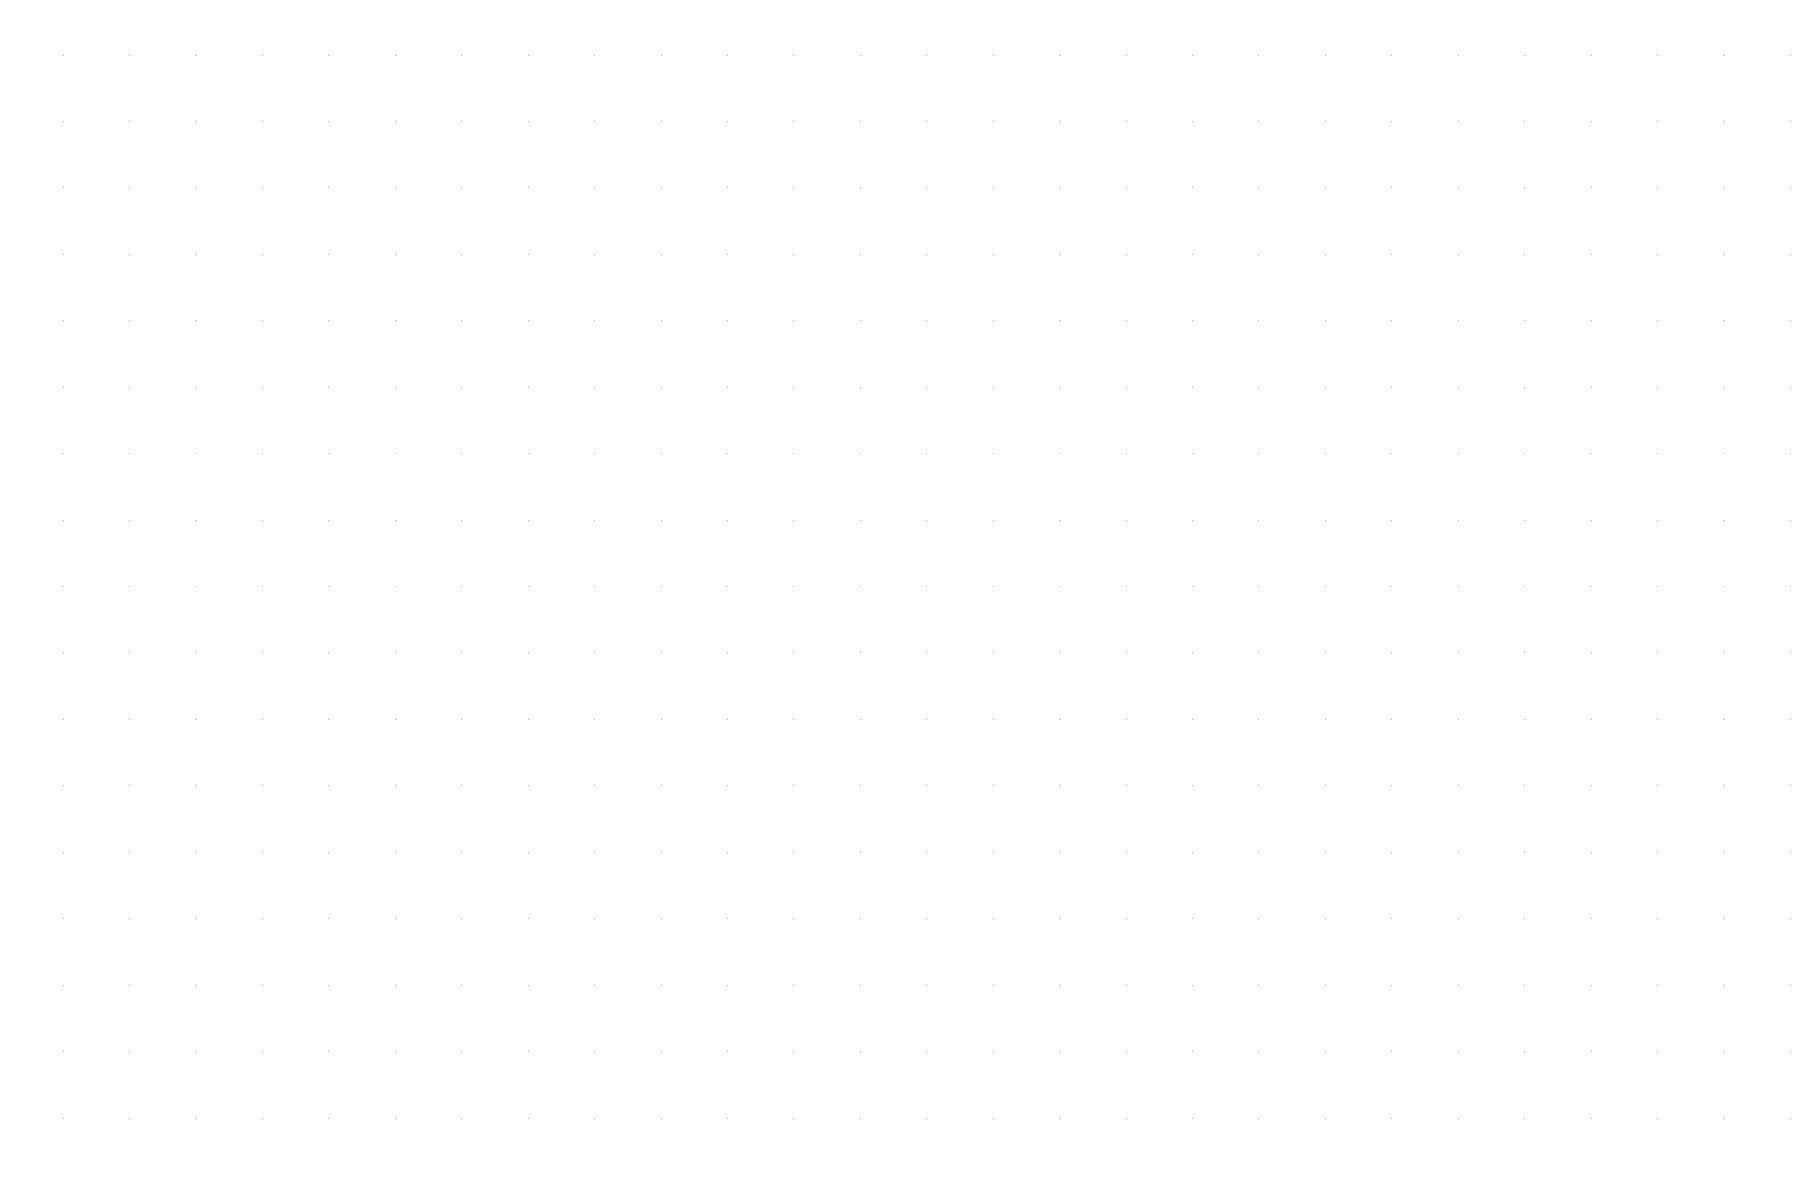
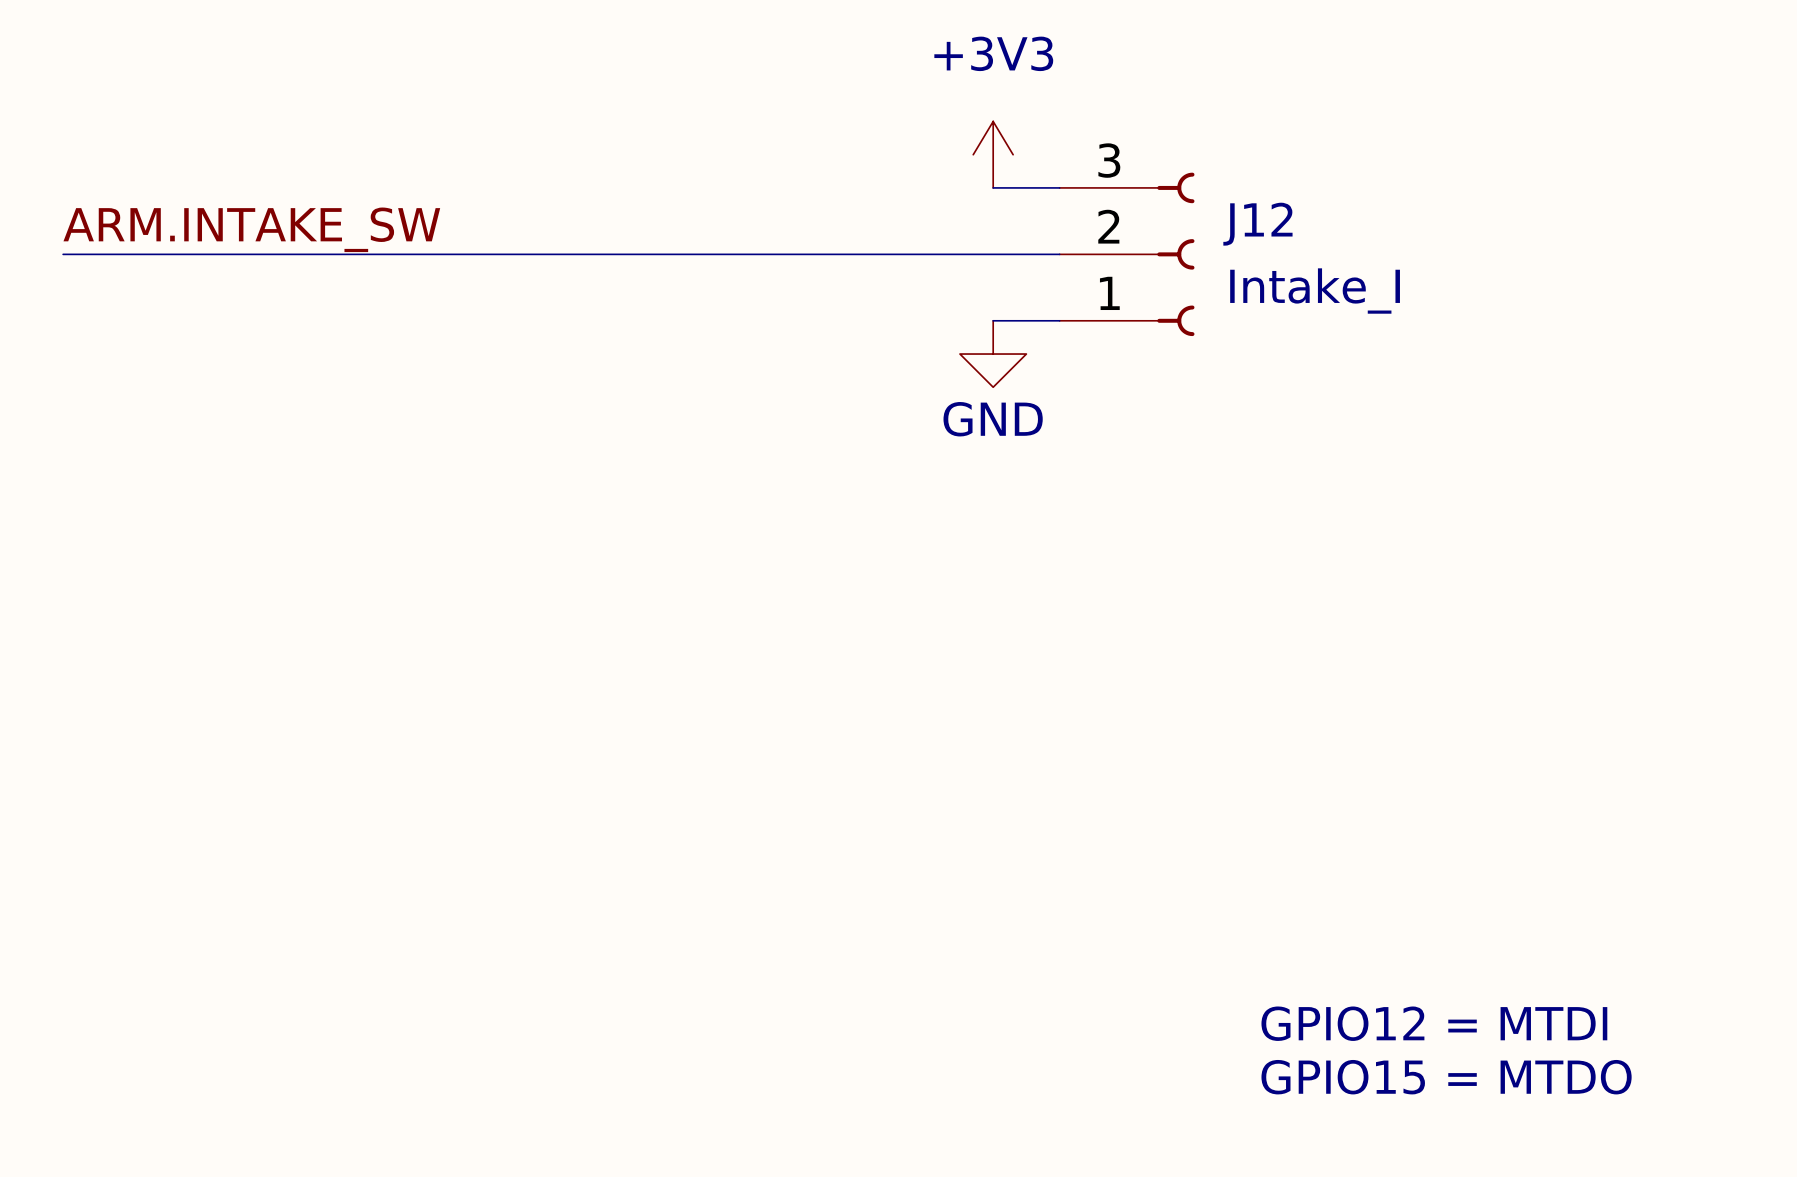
power symbol: none -> +3V3 (993, 154)
wire: none -> (993, 187) (1059, 187)
label: none -> ARM.INTAKE_SW (251, 229)
wire: none -> (63, 254) (1059, 254)
J12: none -> Intake_I (1127, 254)
wire: none -> (993, 320) (1059, 320)
power symbol: none -> GND (993, 354)
text: none -> GPIO12 = MTDI (1434, 1023)
text: none -> GPIO15 = MTDO (1446, 1077)

